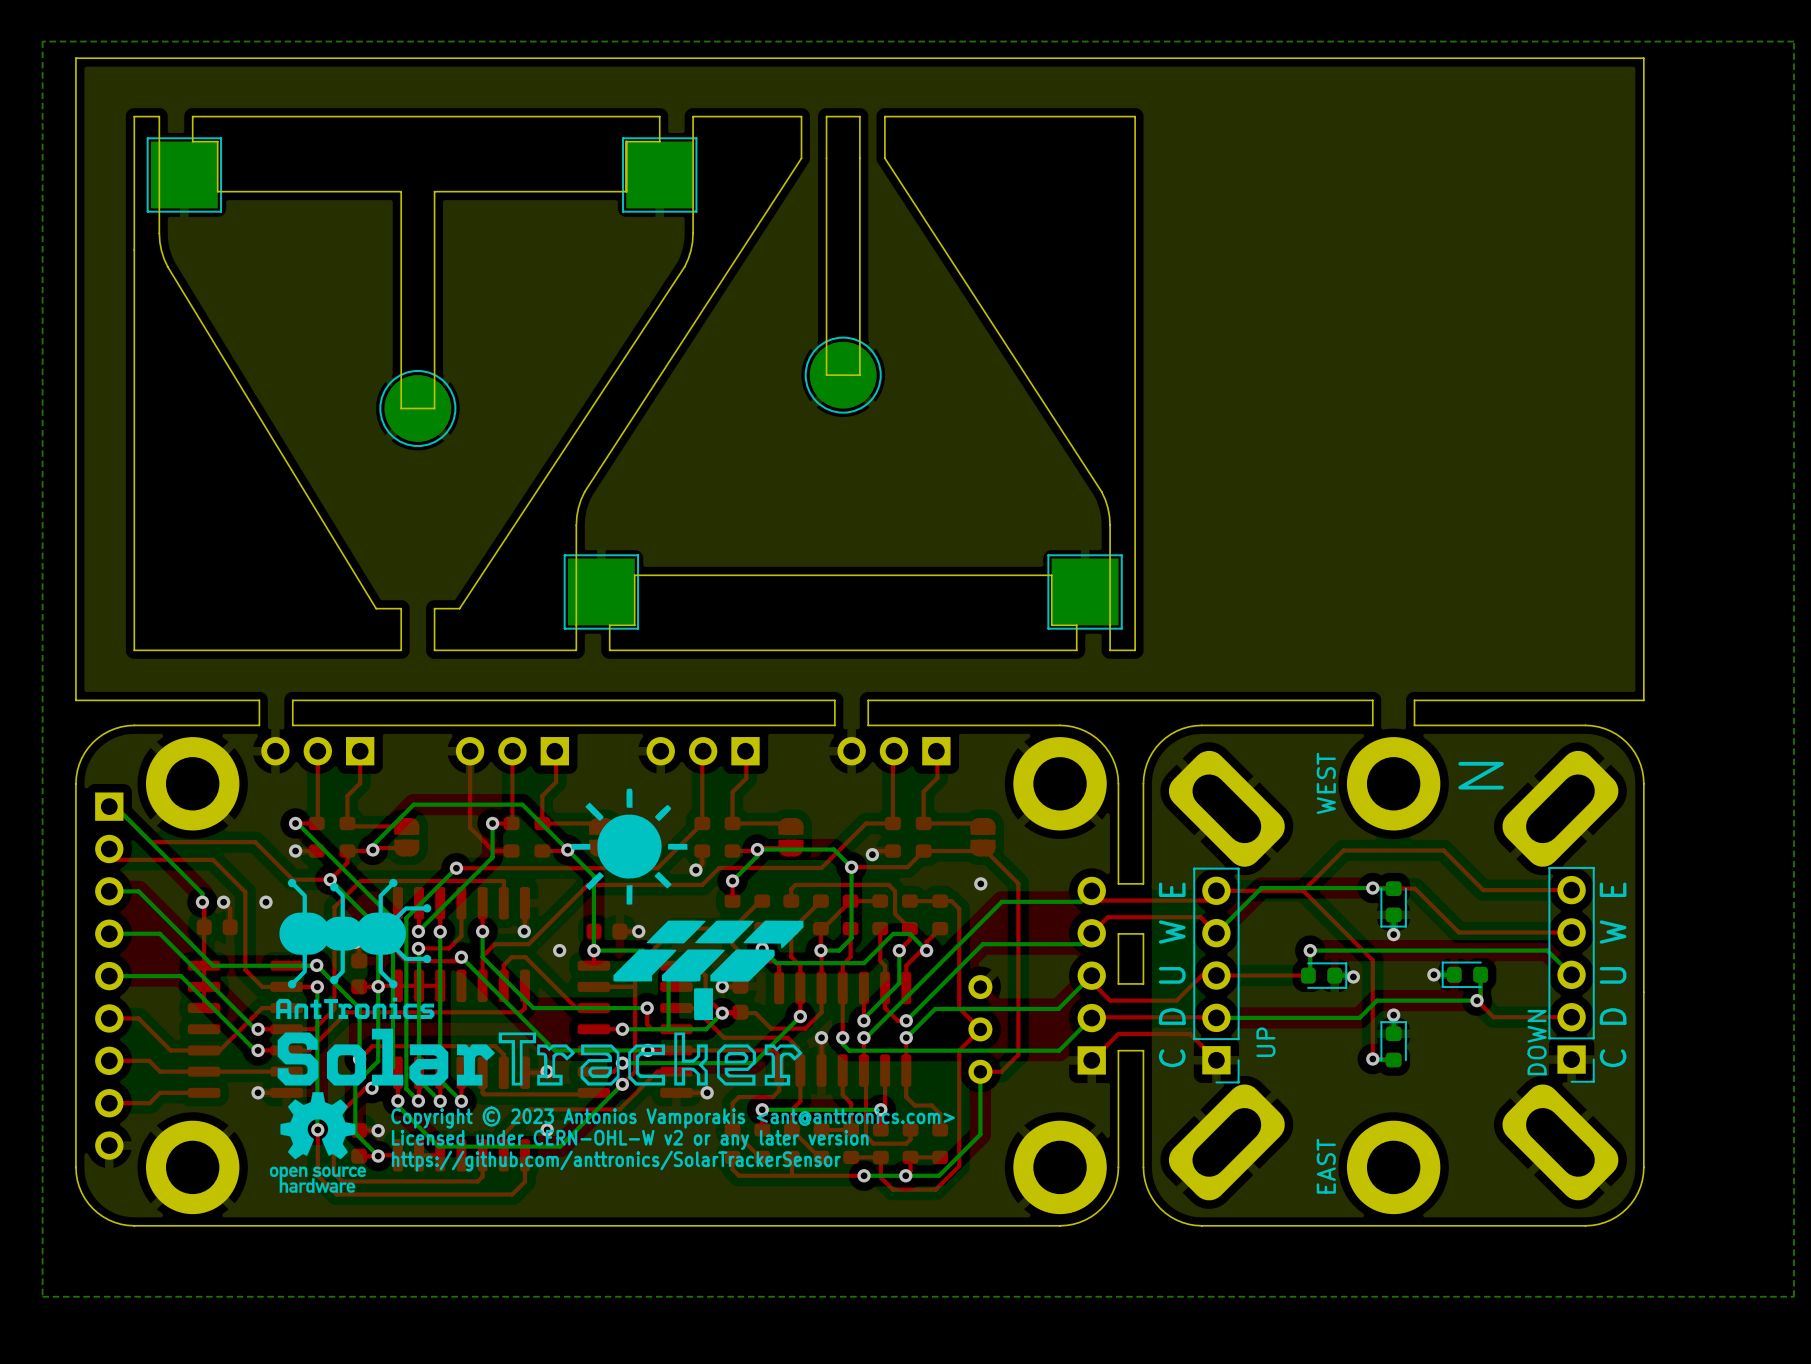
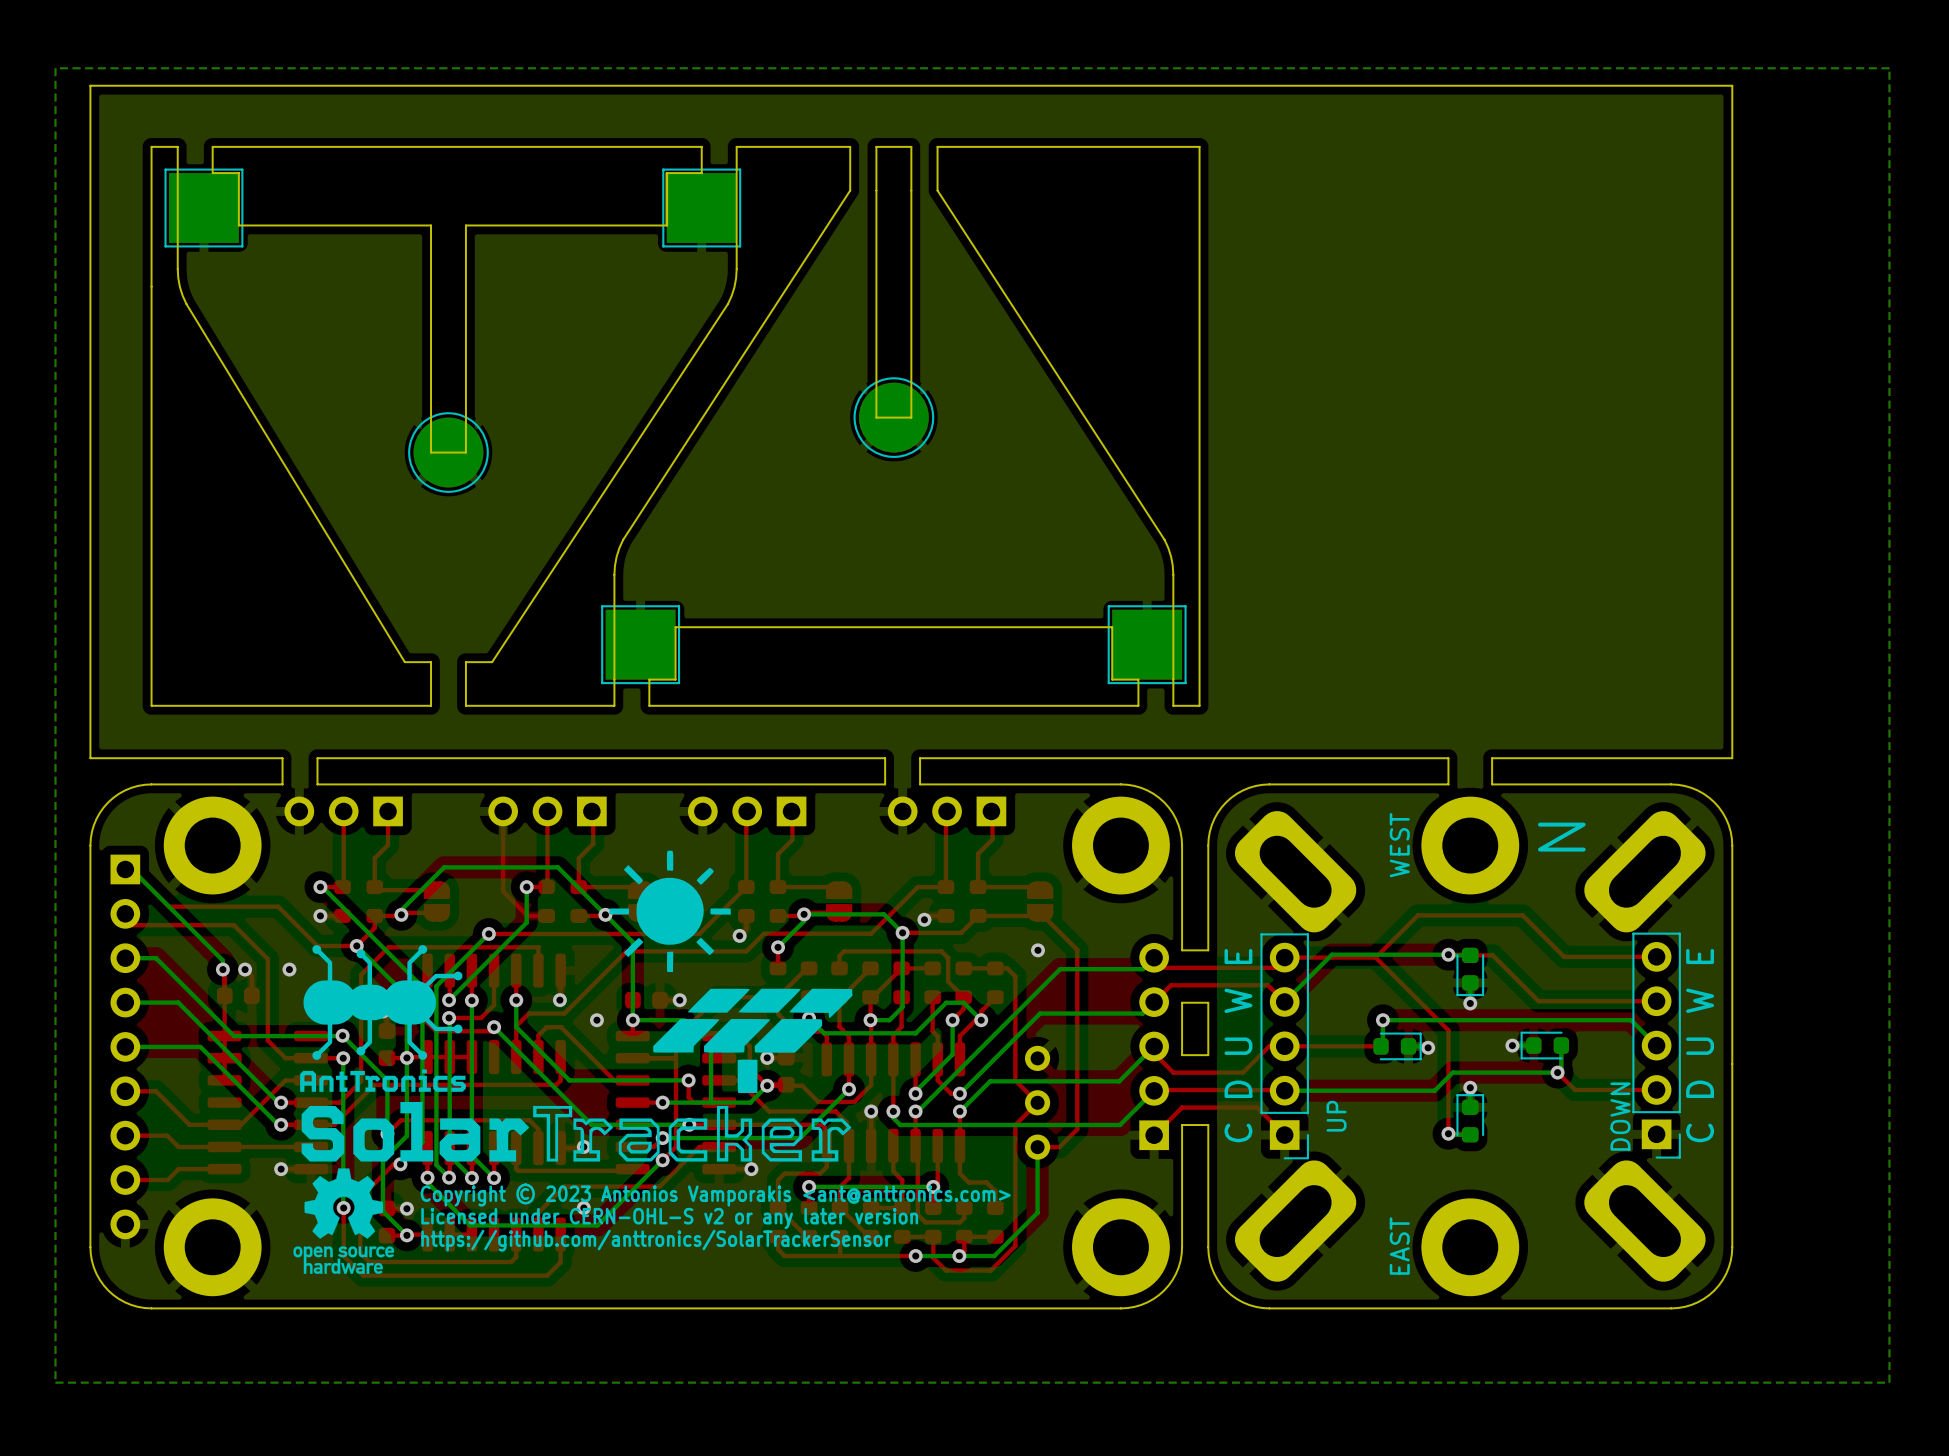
text: Licensed under CERN-OHL-W v2 or any later version (630, 1139) -> Licensed under CERN-OHL-S v2 or any later version (669, 1218)

